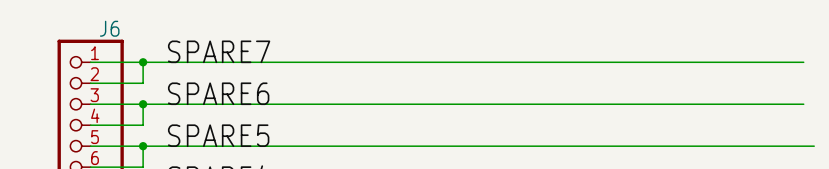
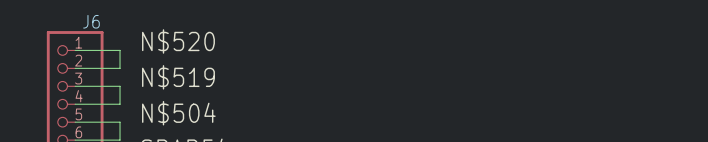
label: SPARE7 (219, 51) -> N$520 (178, 41)
wire: (143, 62) (803, 62) -> none
junction: (143, 62) -> none
label: SPARE6 (218, 93) -> N$519 (178, 77)
wire: (143, 104) (803, 104) -> none
junction: (143, 104) -> none
label: SPARE5 (218, 135) -> N$504 (178, 113)
wire: (143, 146) (814, 146) -> none
junction: (143, 146) -> none

